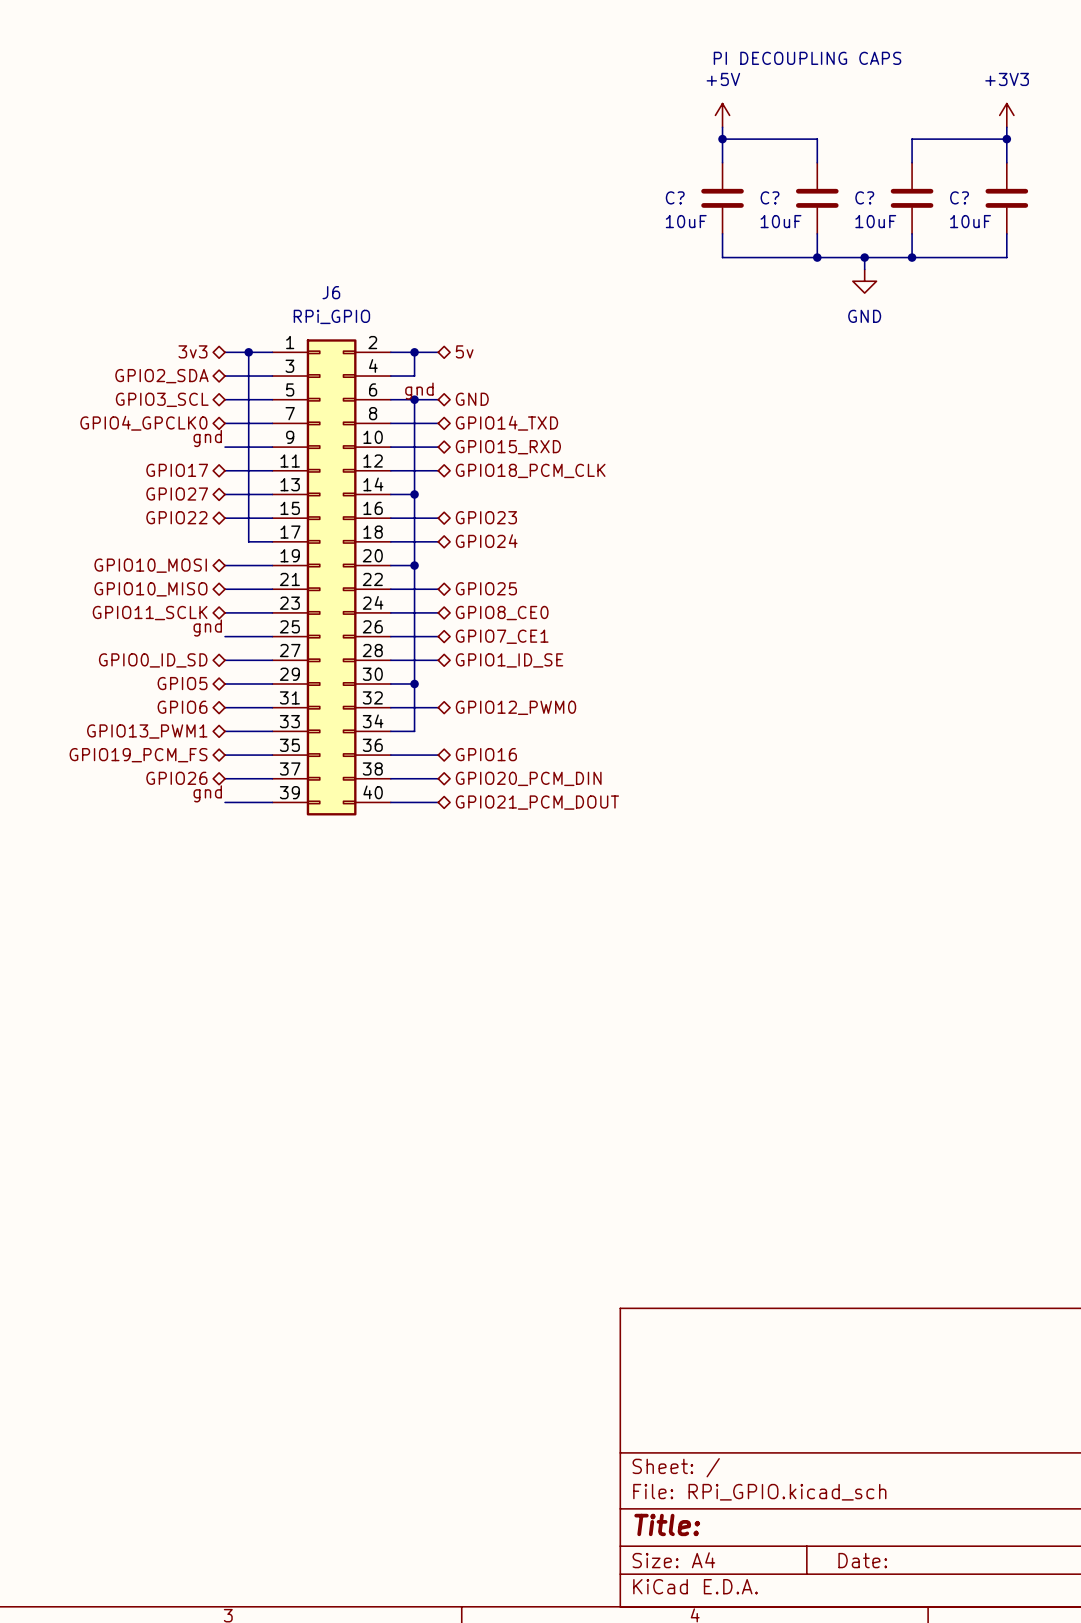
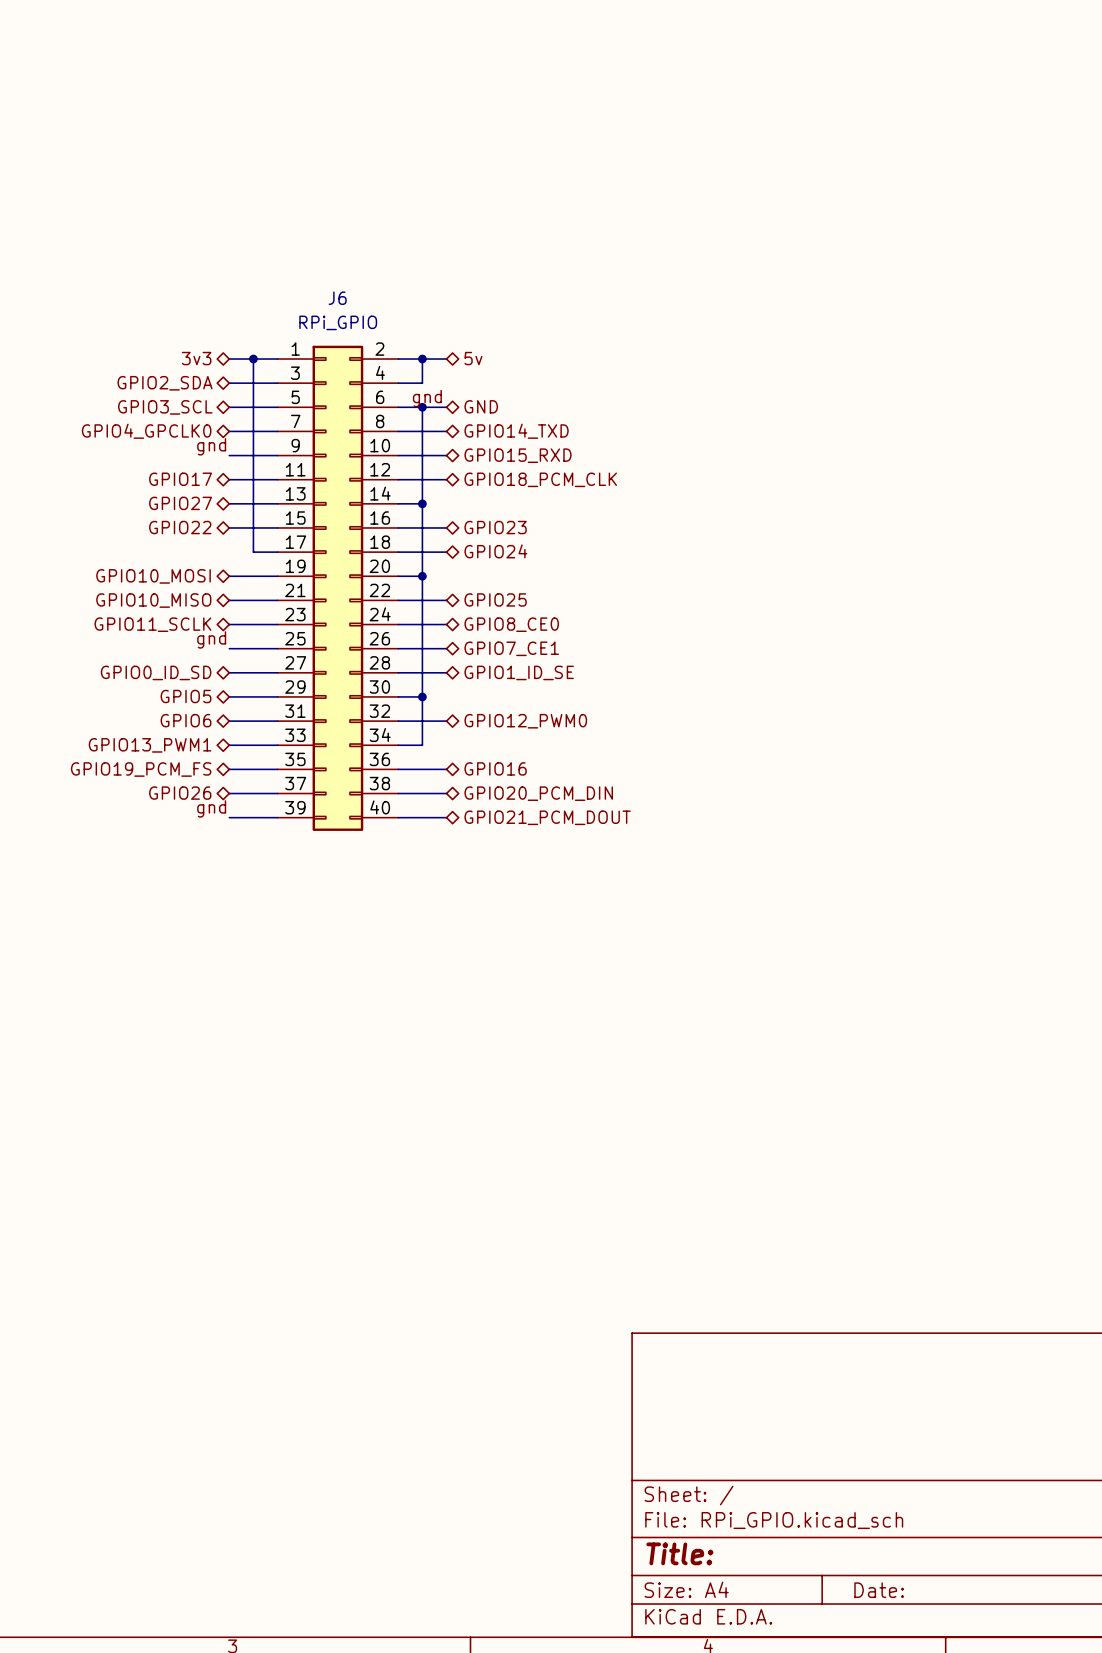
text: PI DECOUPLING CAPS (807, 58) -> none
power symbol: +5V (722, 115) -> none
power symbol: +3V3 (1006, 115) -> none
wire: (722, 127) (722, 162) -> none
wire: (1006, 127) (1006, 162) -> none
wire: (722, 139) (817, 139) (817, 162) -> none
junction: (722, 139) -> none
wire: (1006, 139) (912, 139) (912, 162) -> none
junction: (1006, 139) -> none
C?: 10uF (722, 198) -> none
C?: 10uF (817, 198) -> none
C?: 10uF (912, 198) -> none
C?: 10uF (1006, 198) -> none
wire: (722, 233) (722, 257) (1006, 257) (1006, 233) -> none
wire: (817, 233) (817, 257) -> none
wire: (912, 233) (912, 257) -> none
junction: (817, 257) -> none
wire: (864, 257) (864, 269) -> none
junction: (864, 257) -> none
junction: (912, 257) -> none
power symbol: GND (864, 281) -> none

